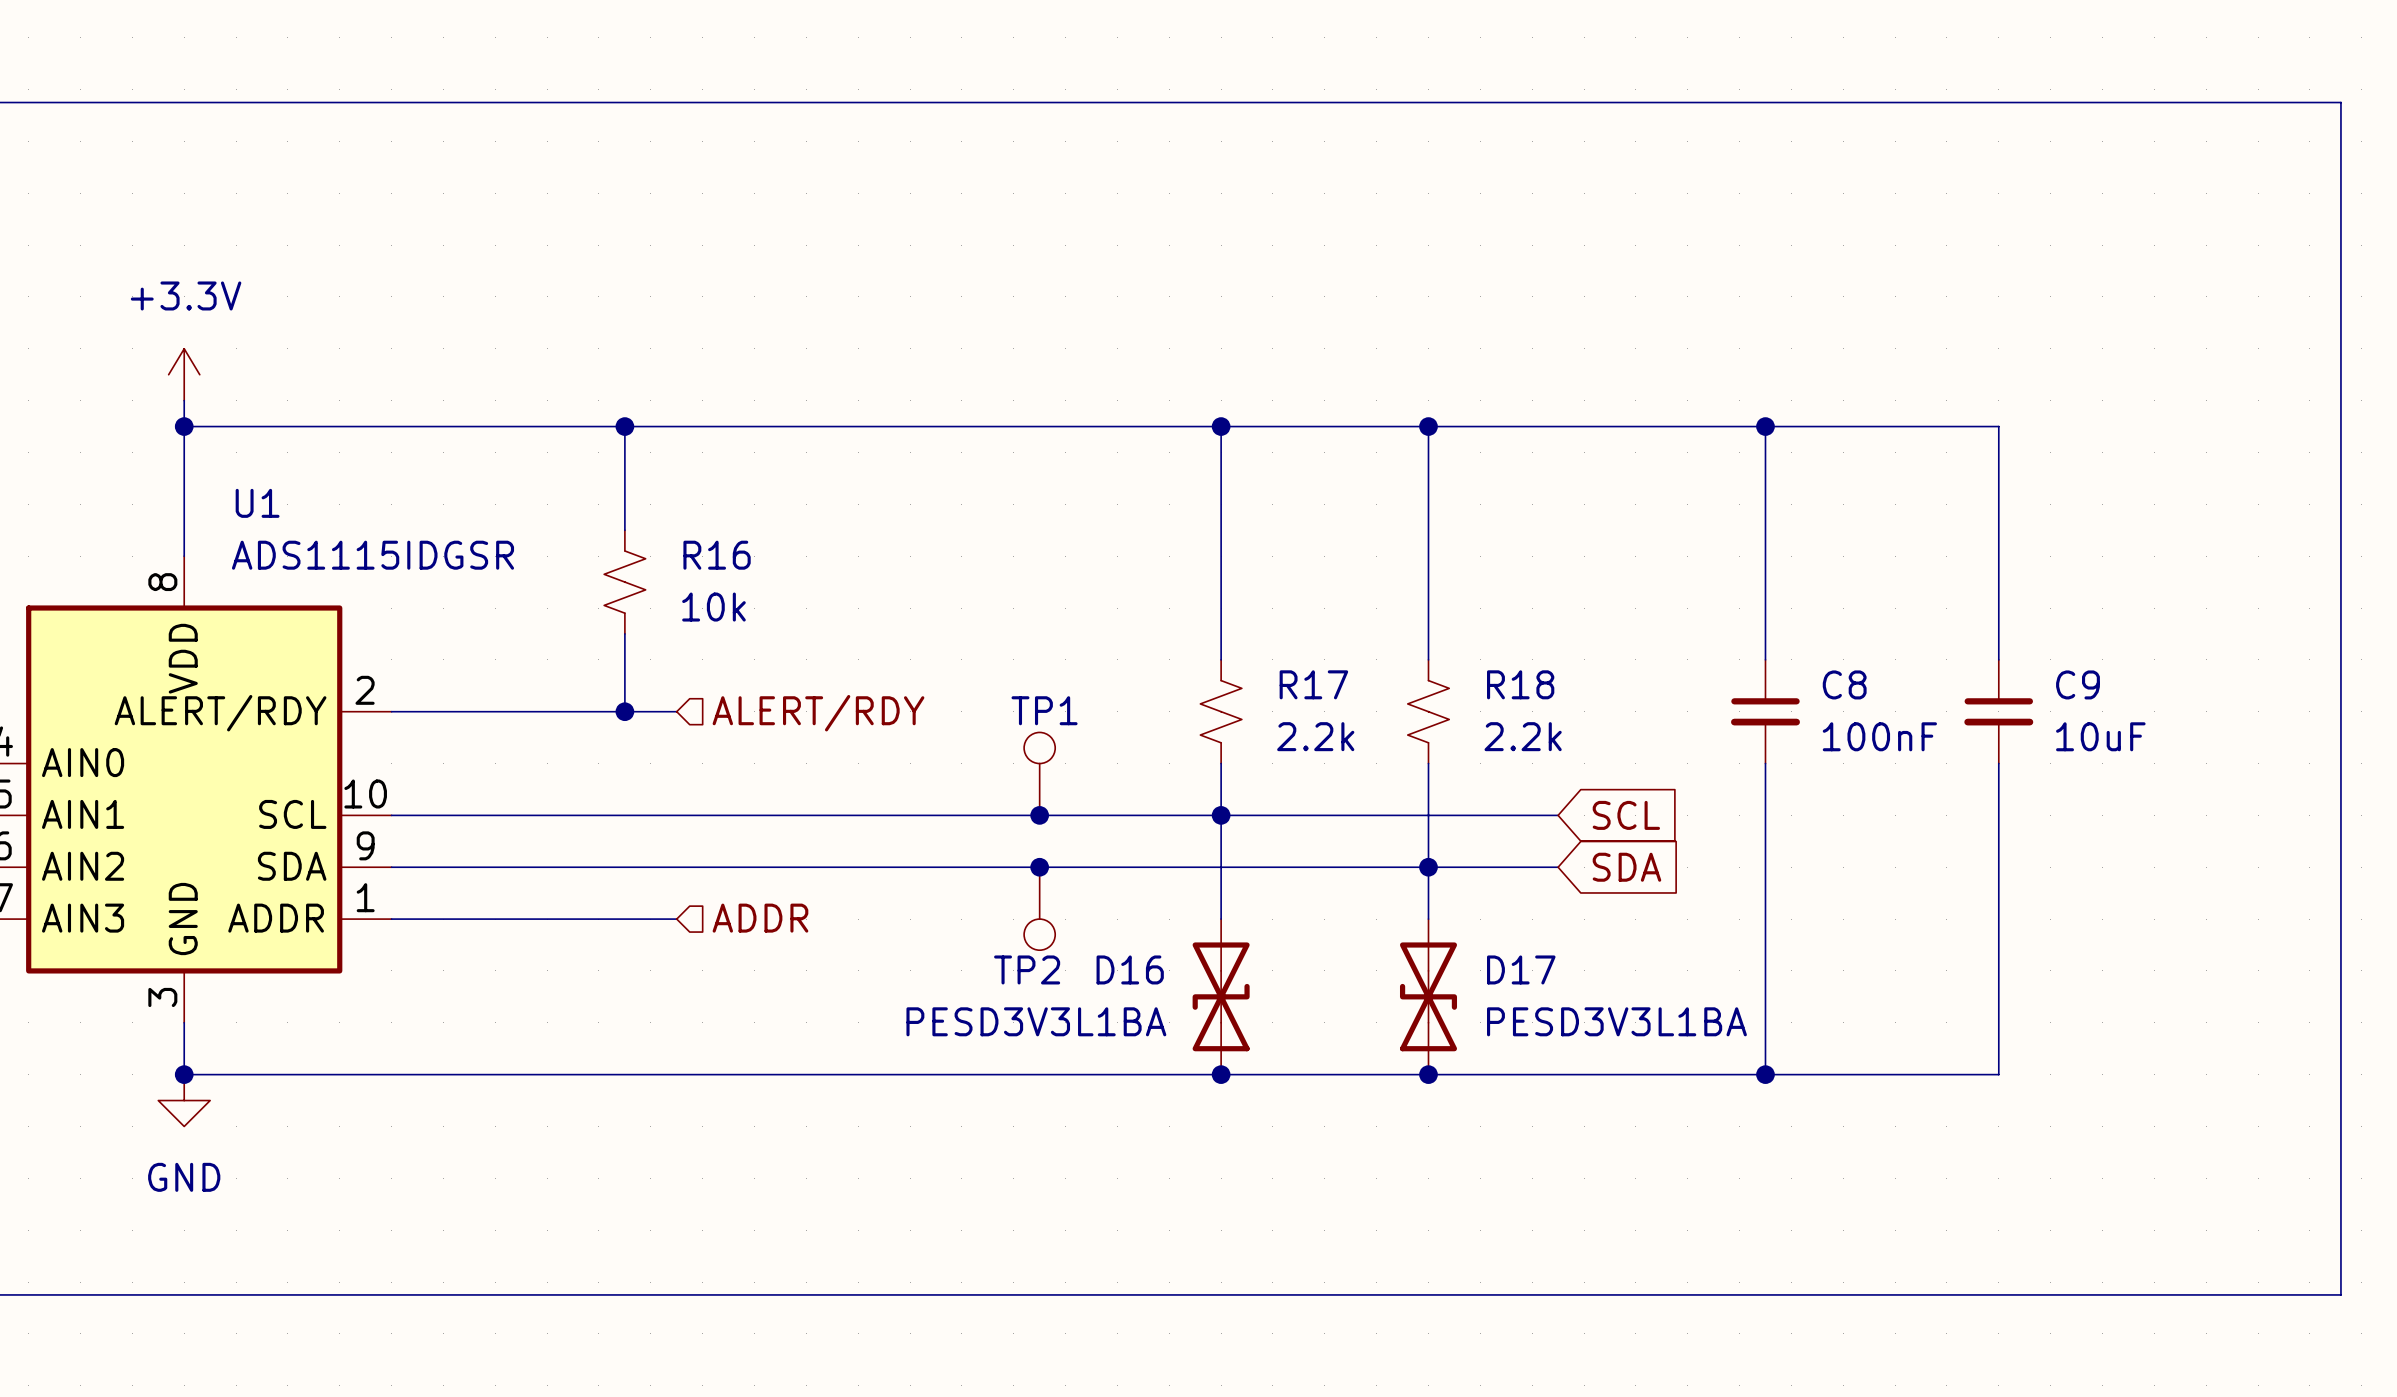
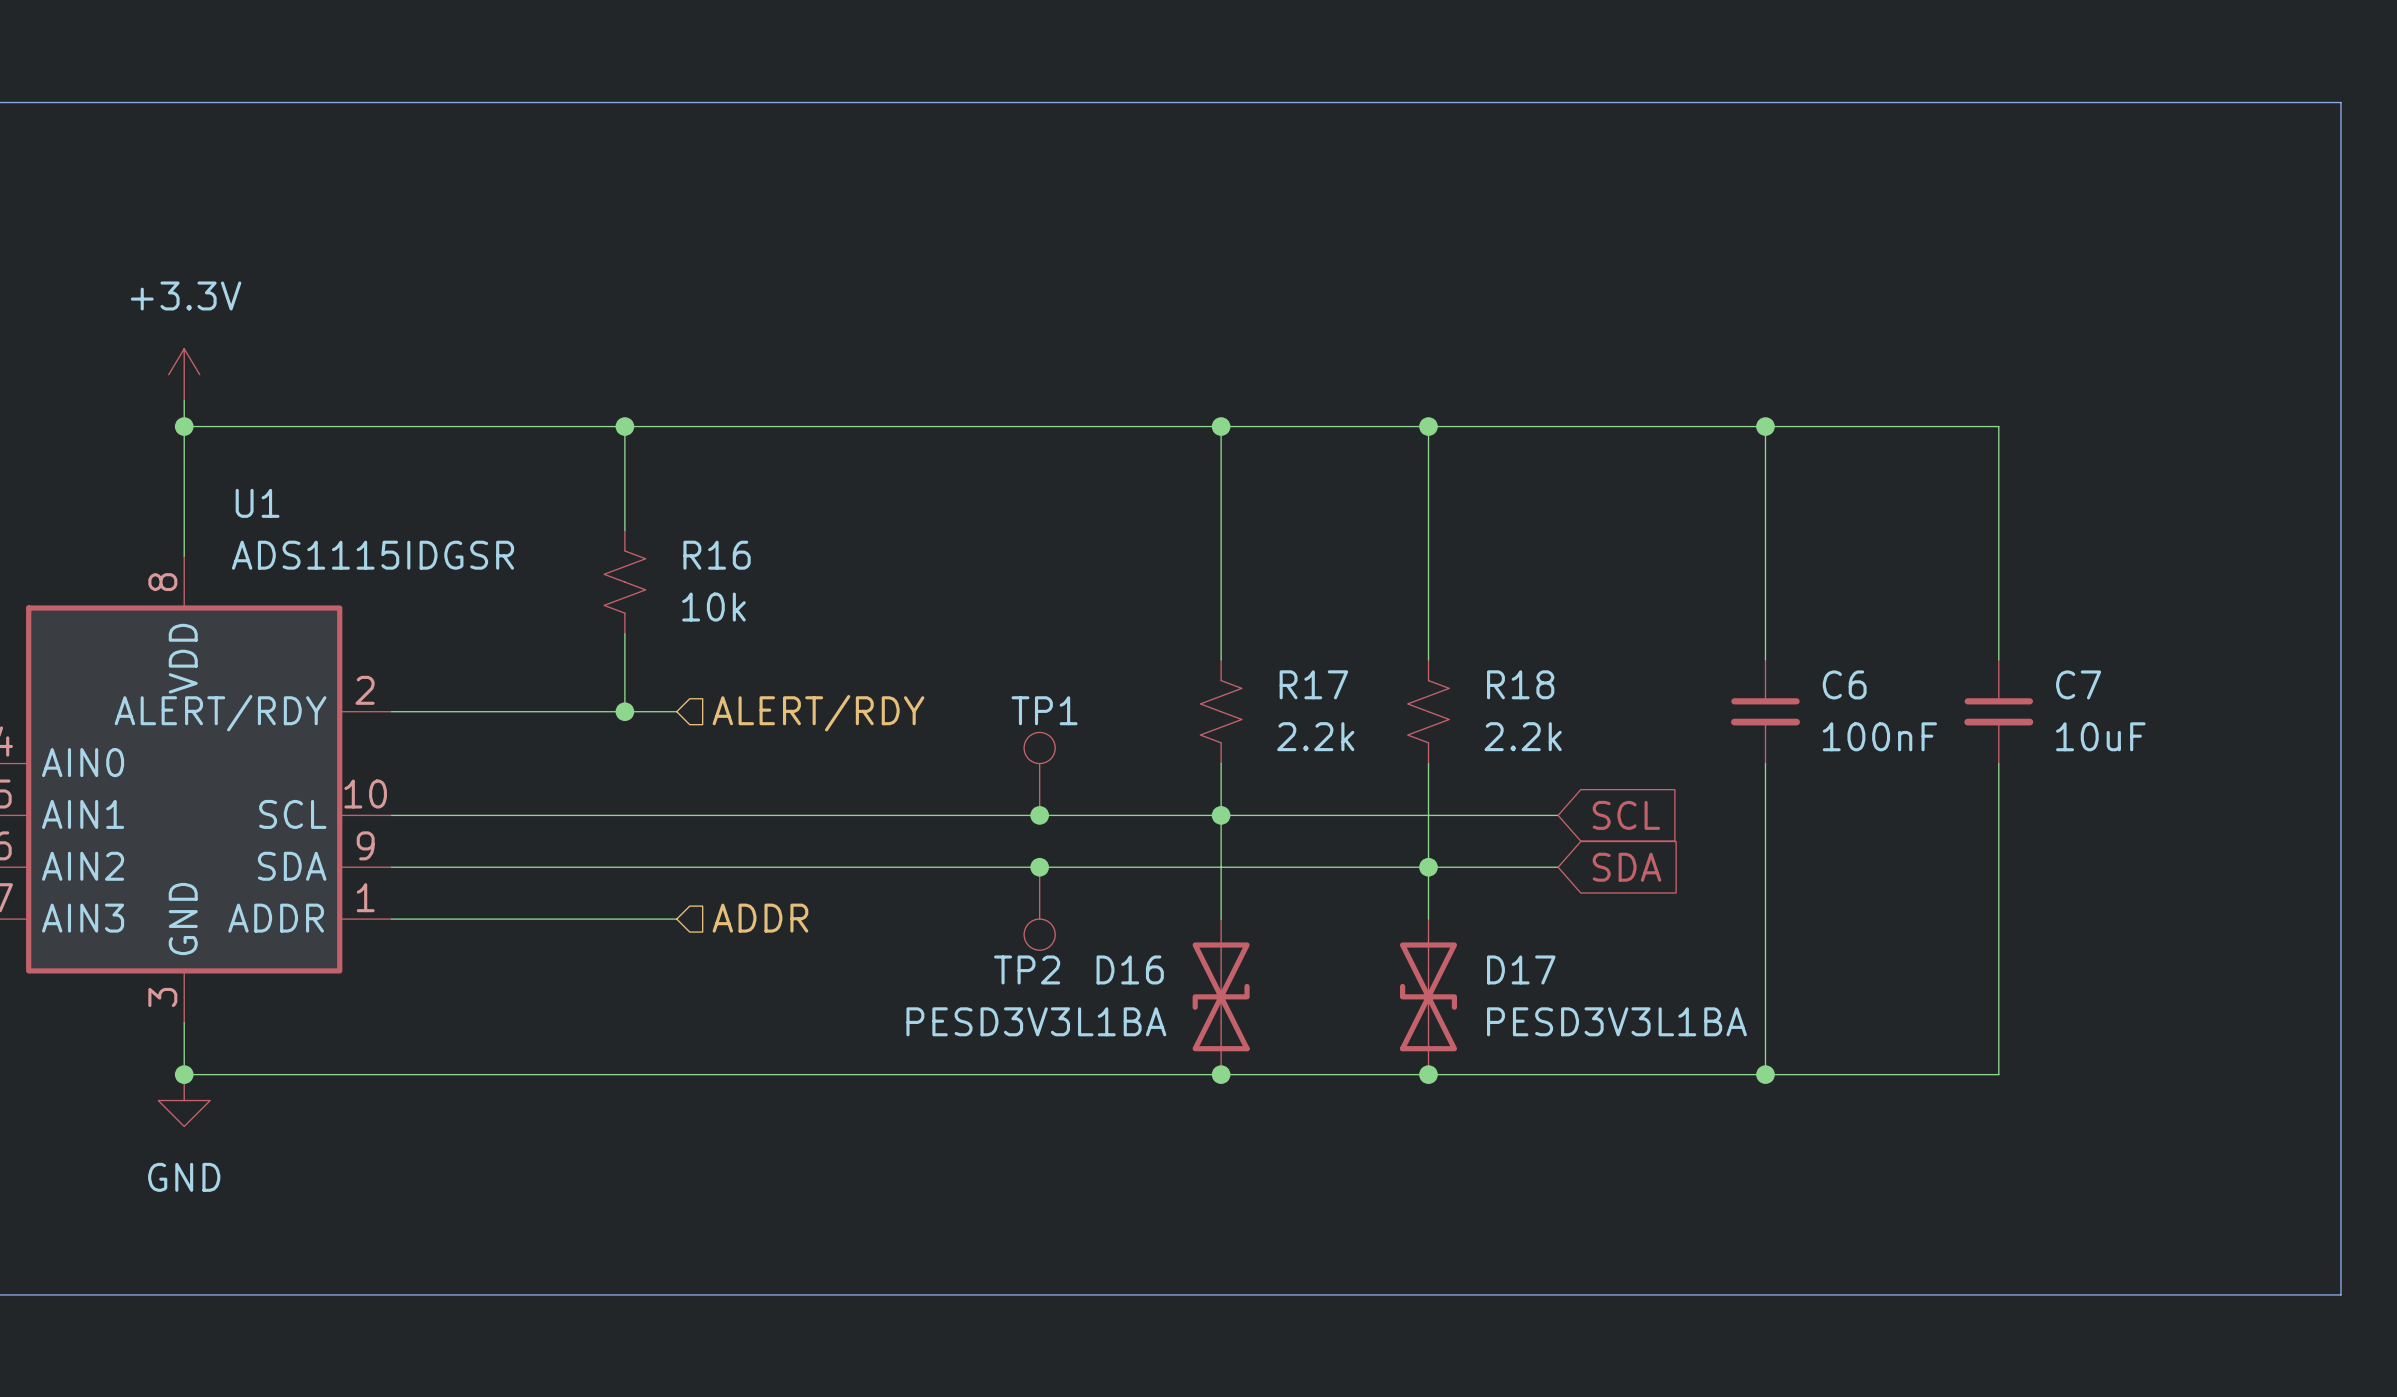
C8 name: C8 (1844, 684) -> C6 (1844, 684)
C9 name: C9 (2077, 684) -> C7 (2078, 684)

